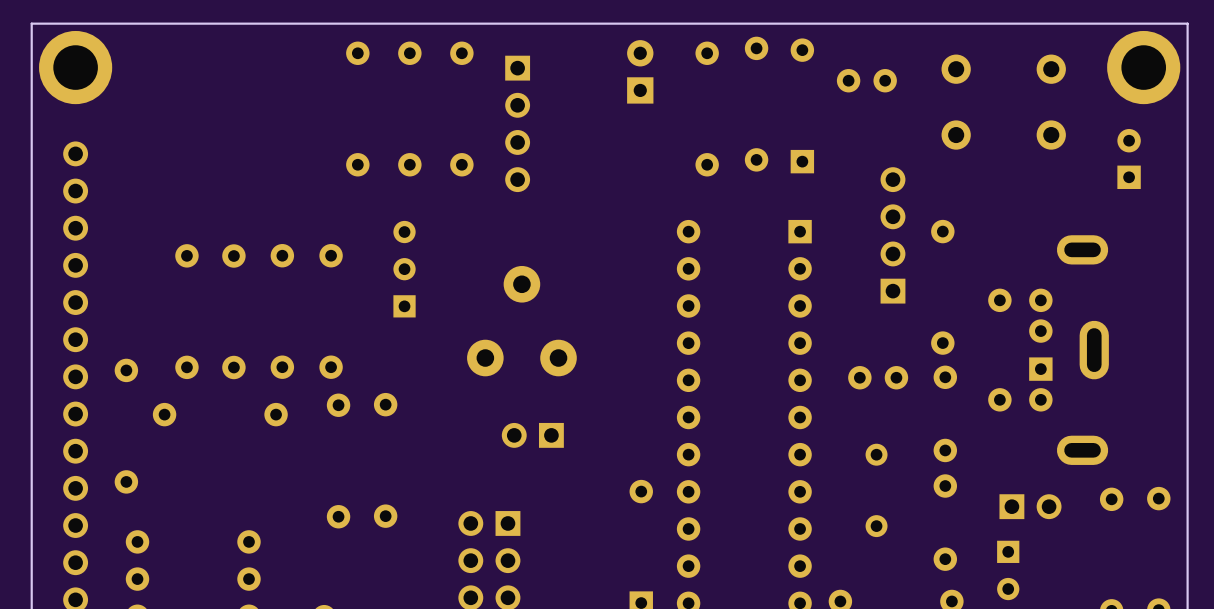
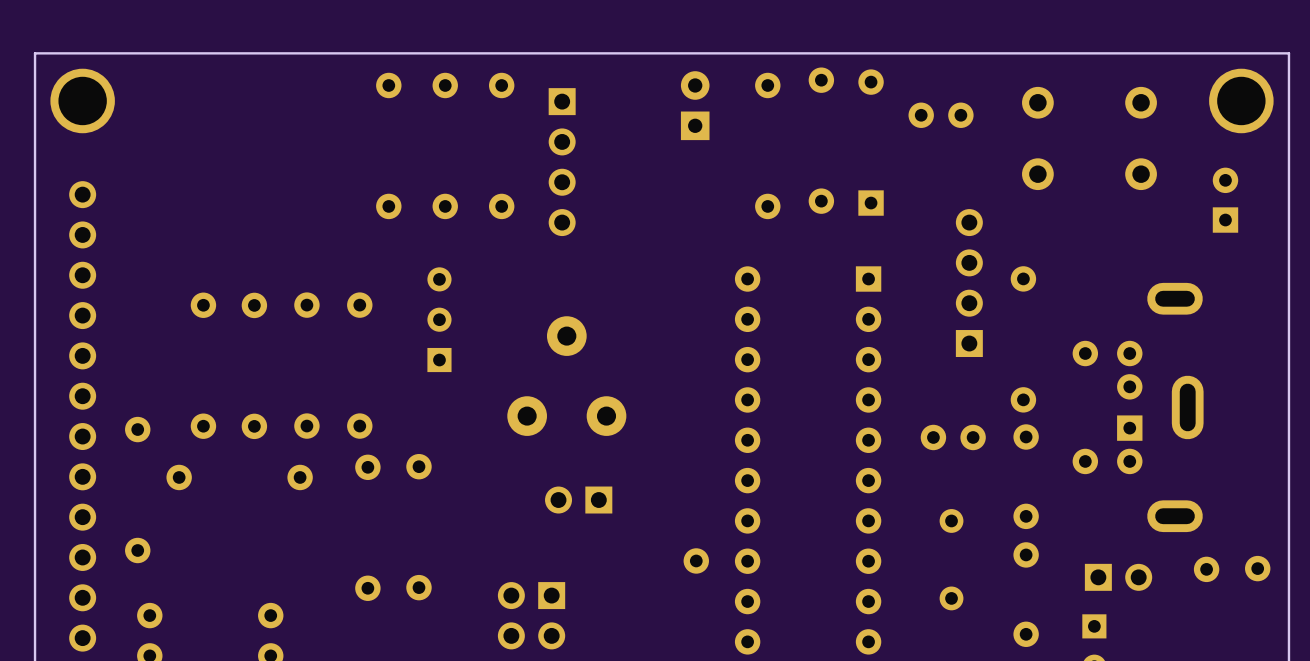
part footprint: [39, 30, 113, 105] -> [50, 68, 115, 134]
part footprint: [1107, 30, 1181, 105] -> [1209, 68, 1274, 134]

